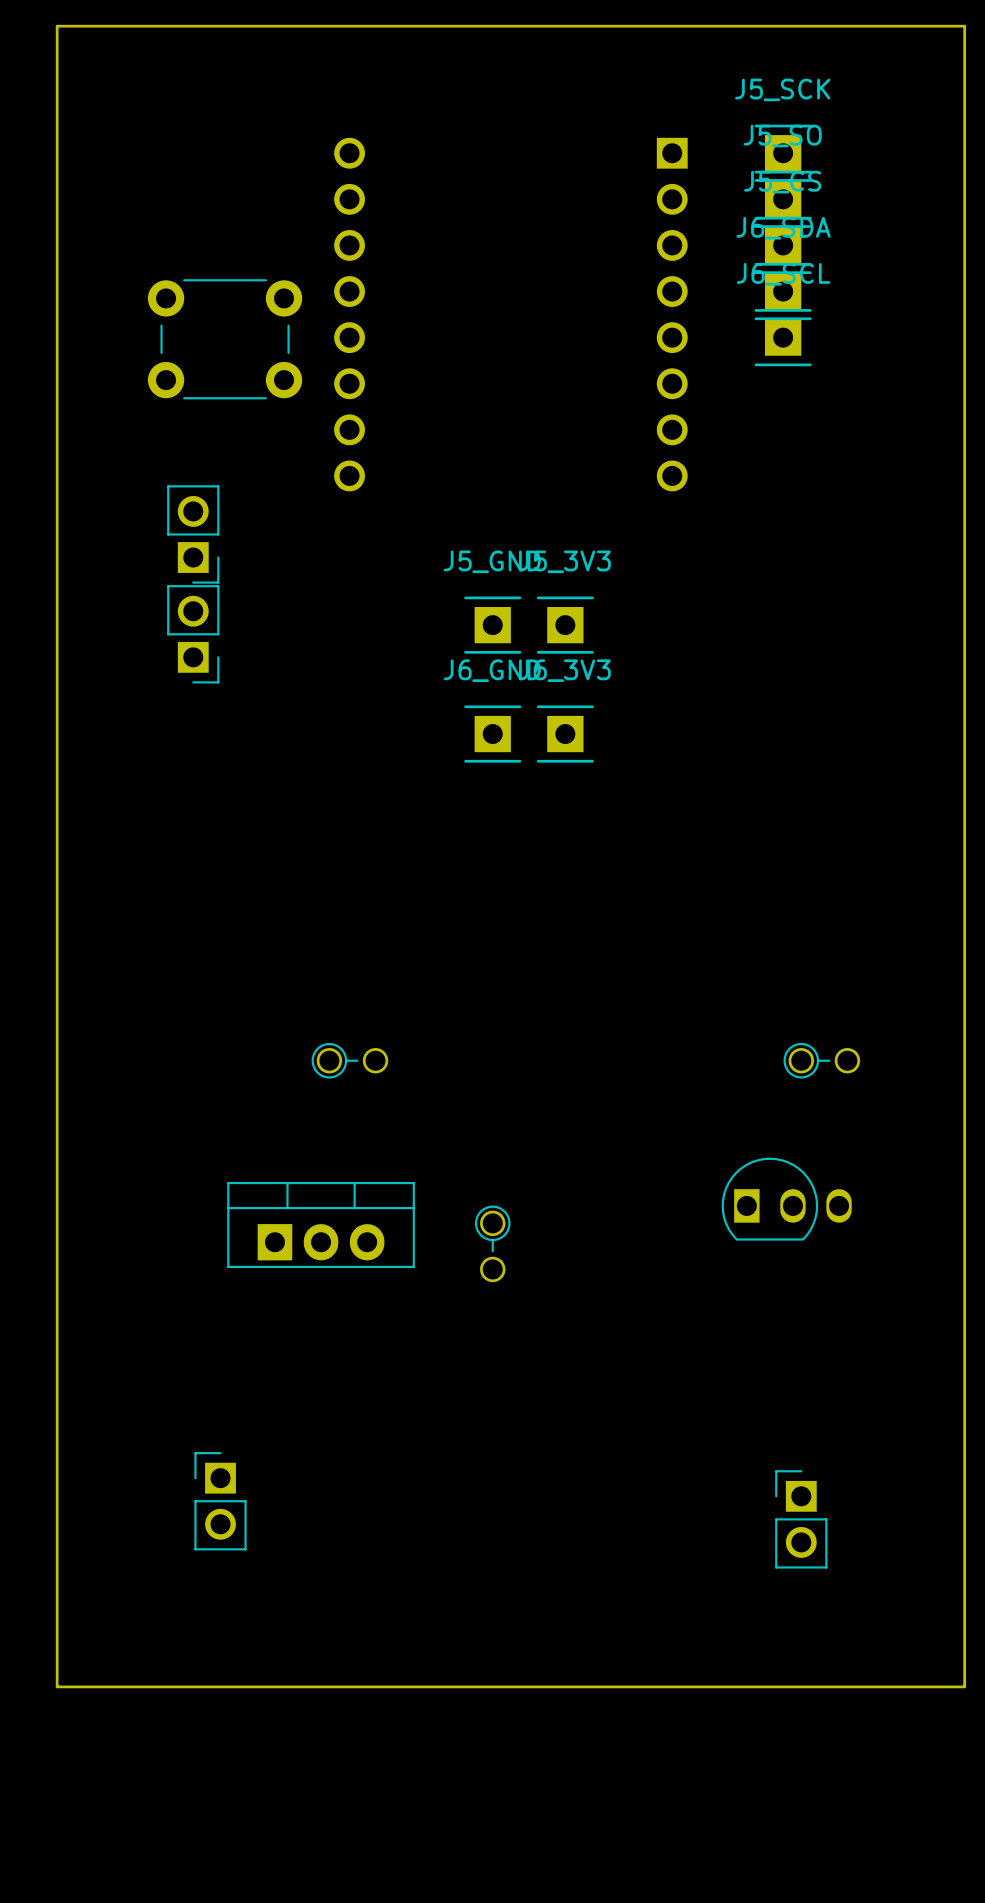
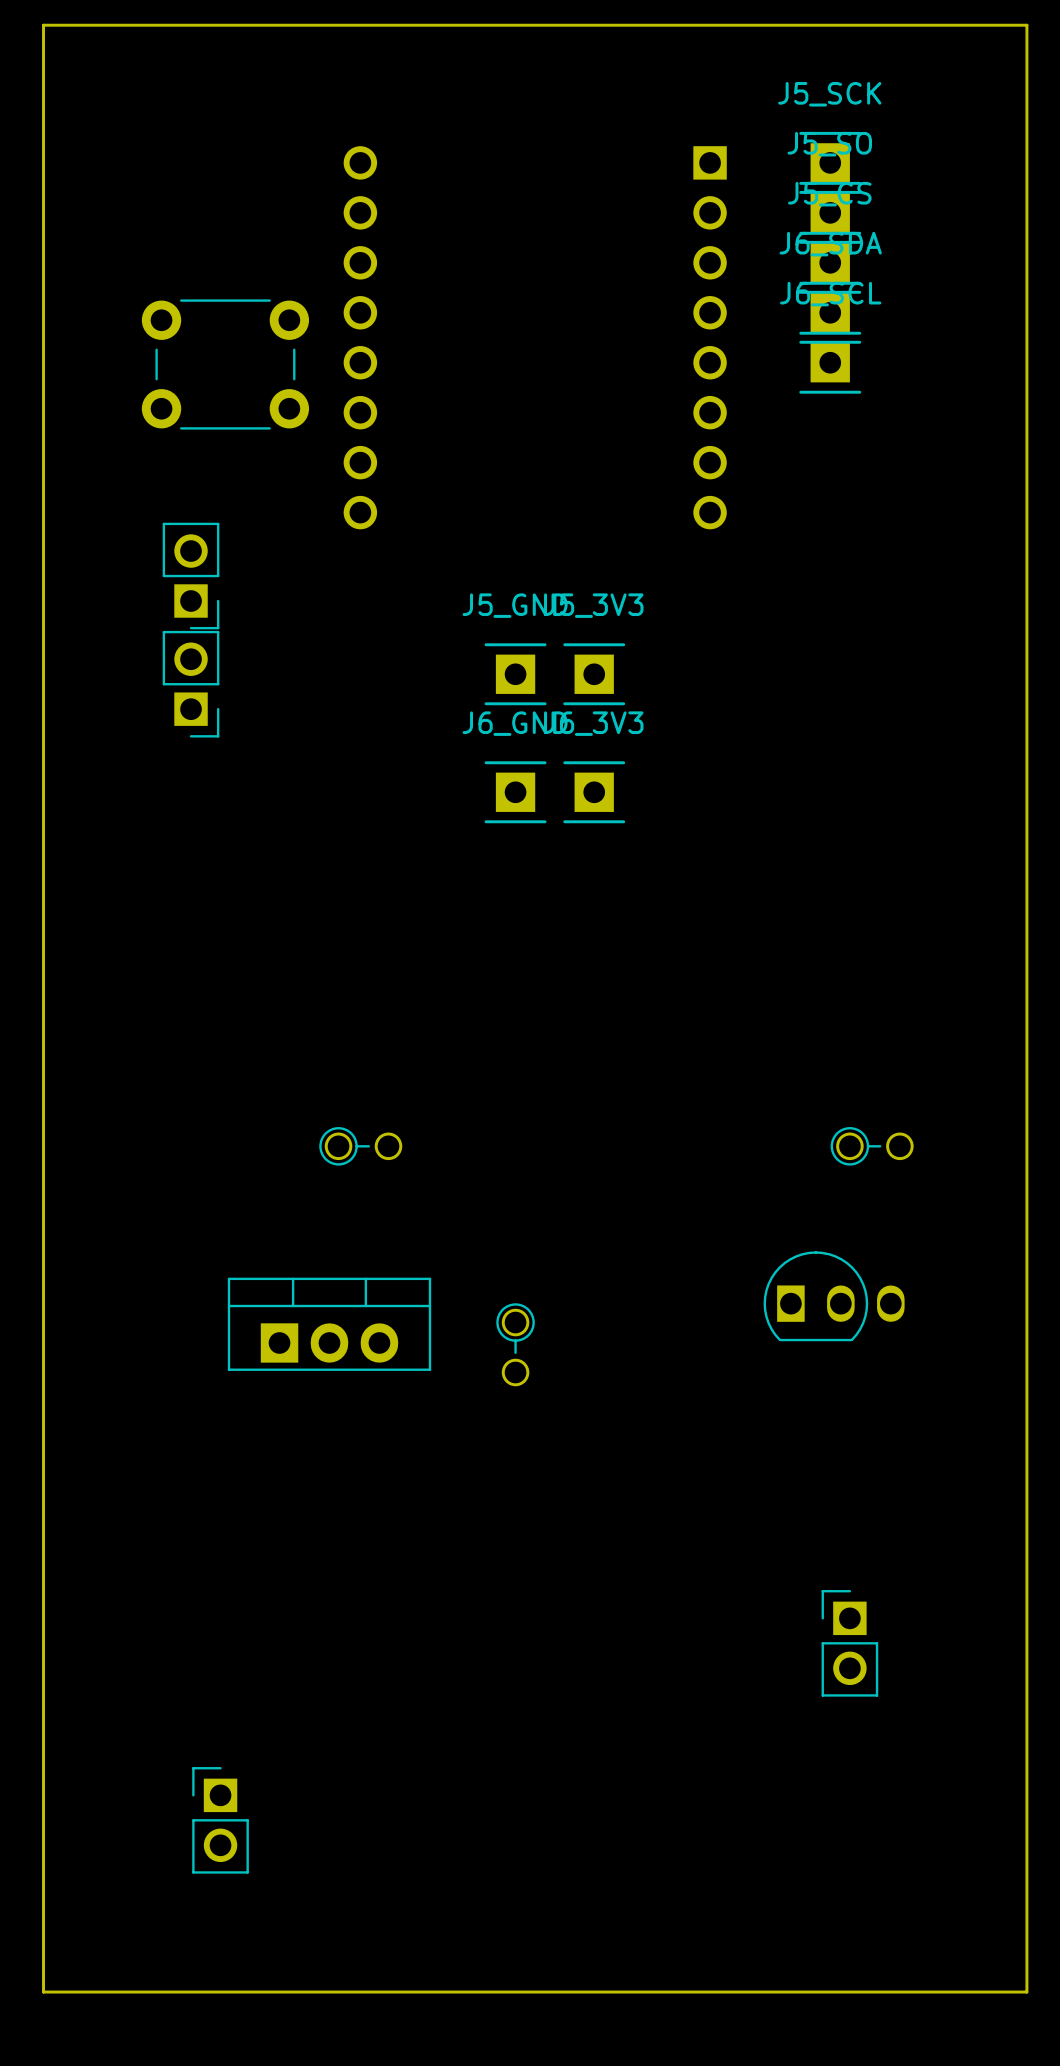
part position: (220, 1501) -> (220, 1820)
board edge: (964, 1686) (57, 1686) -> (1026, 1824) (1026, 1992) (43, 1992) (43, 1824)

